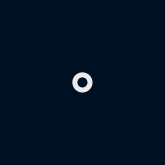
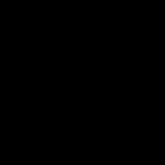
via: (82, 82) -> none

